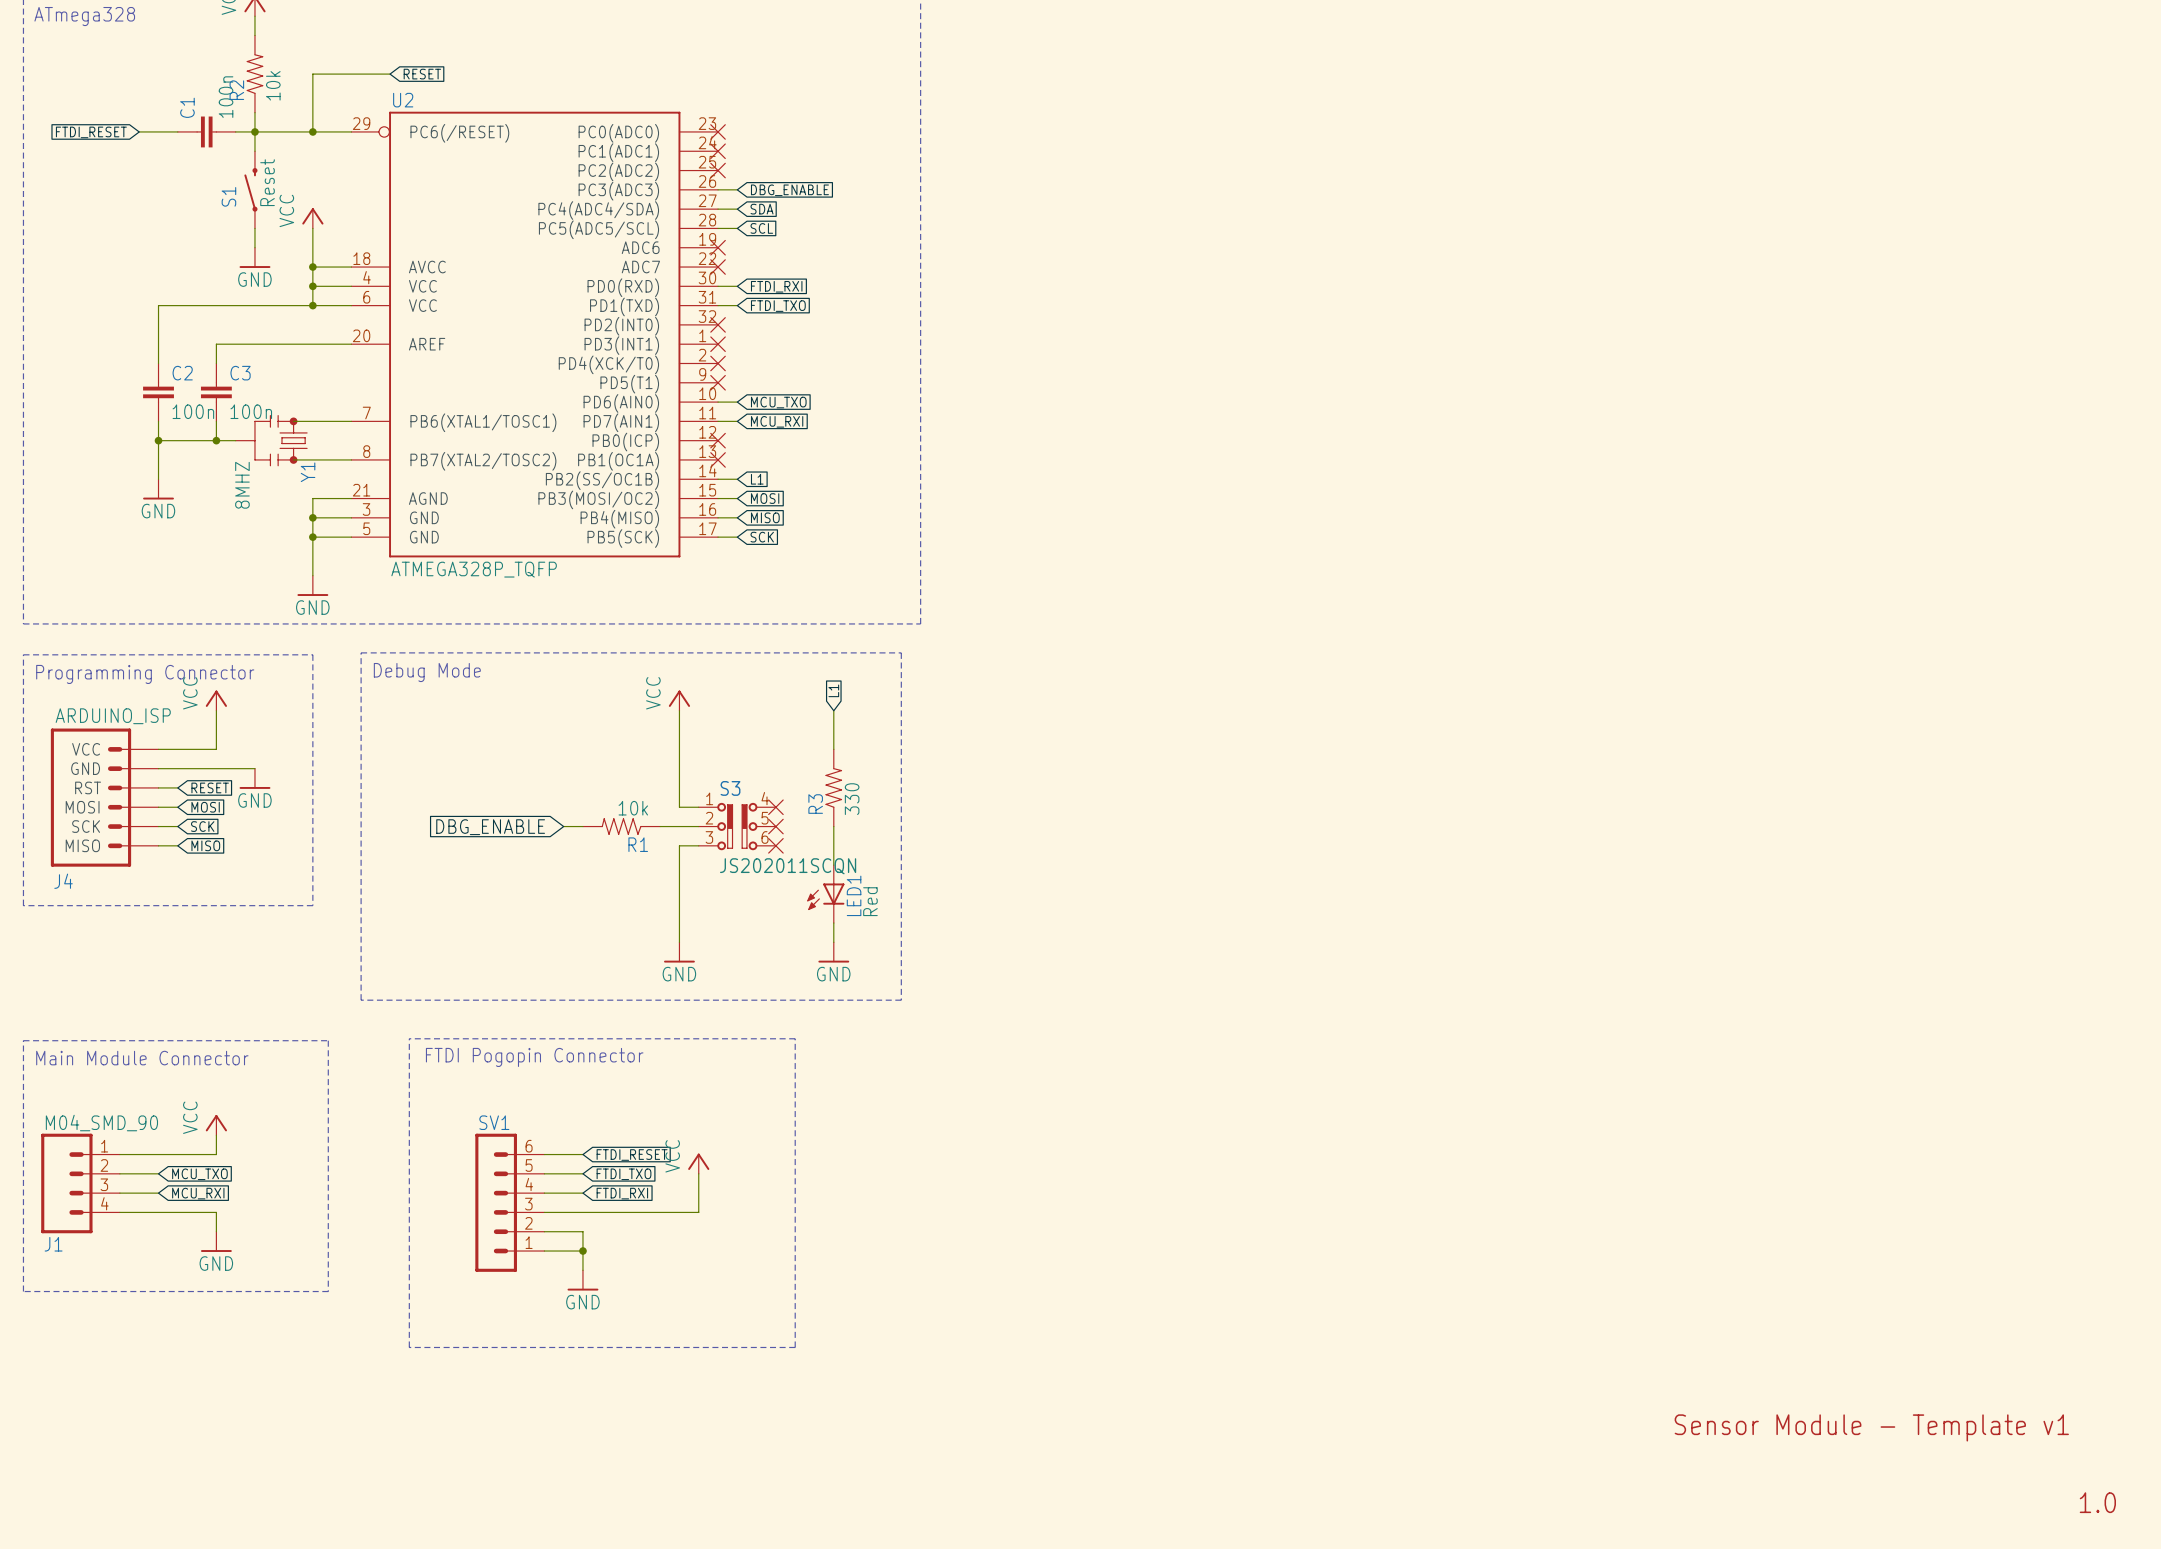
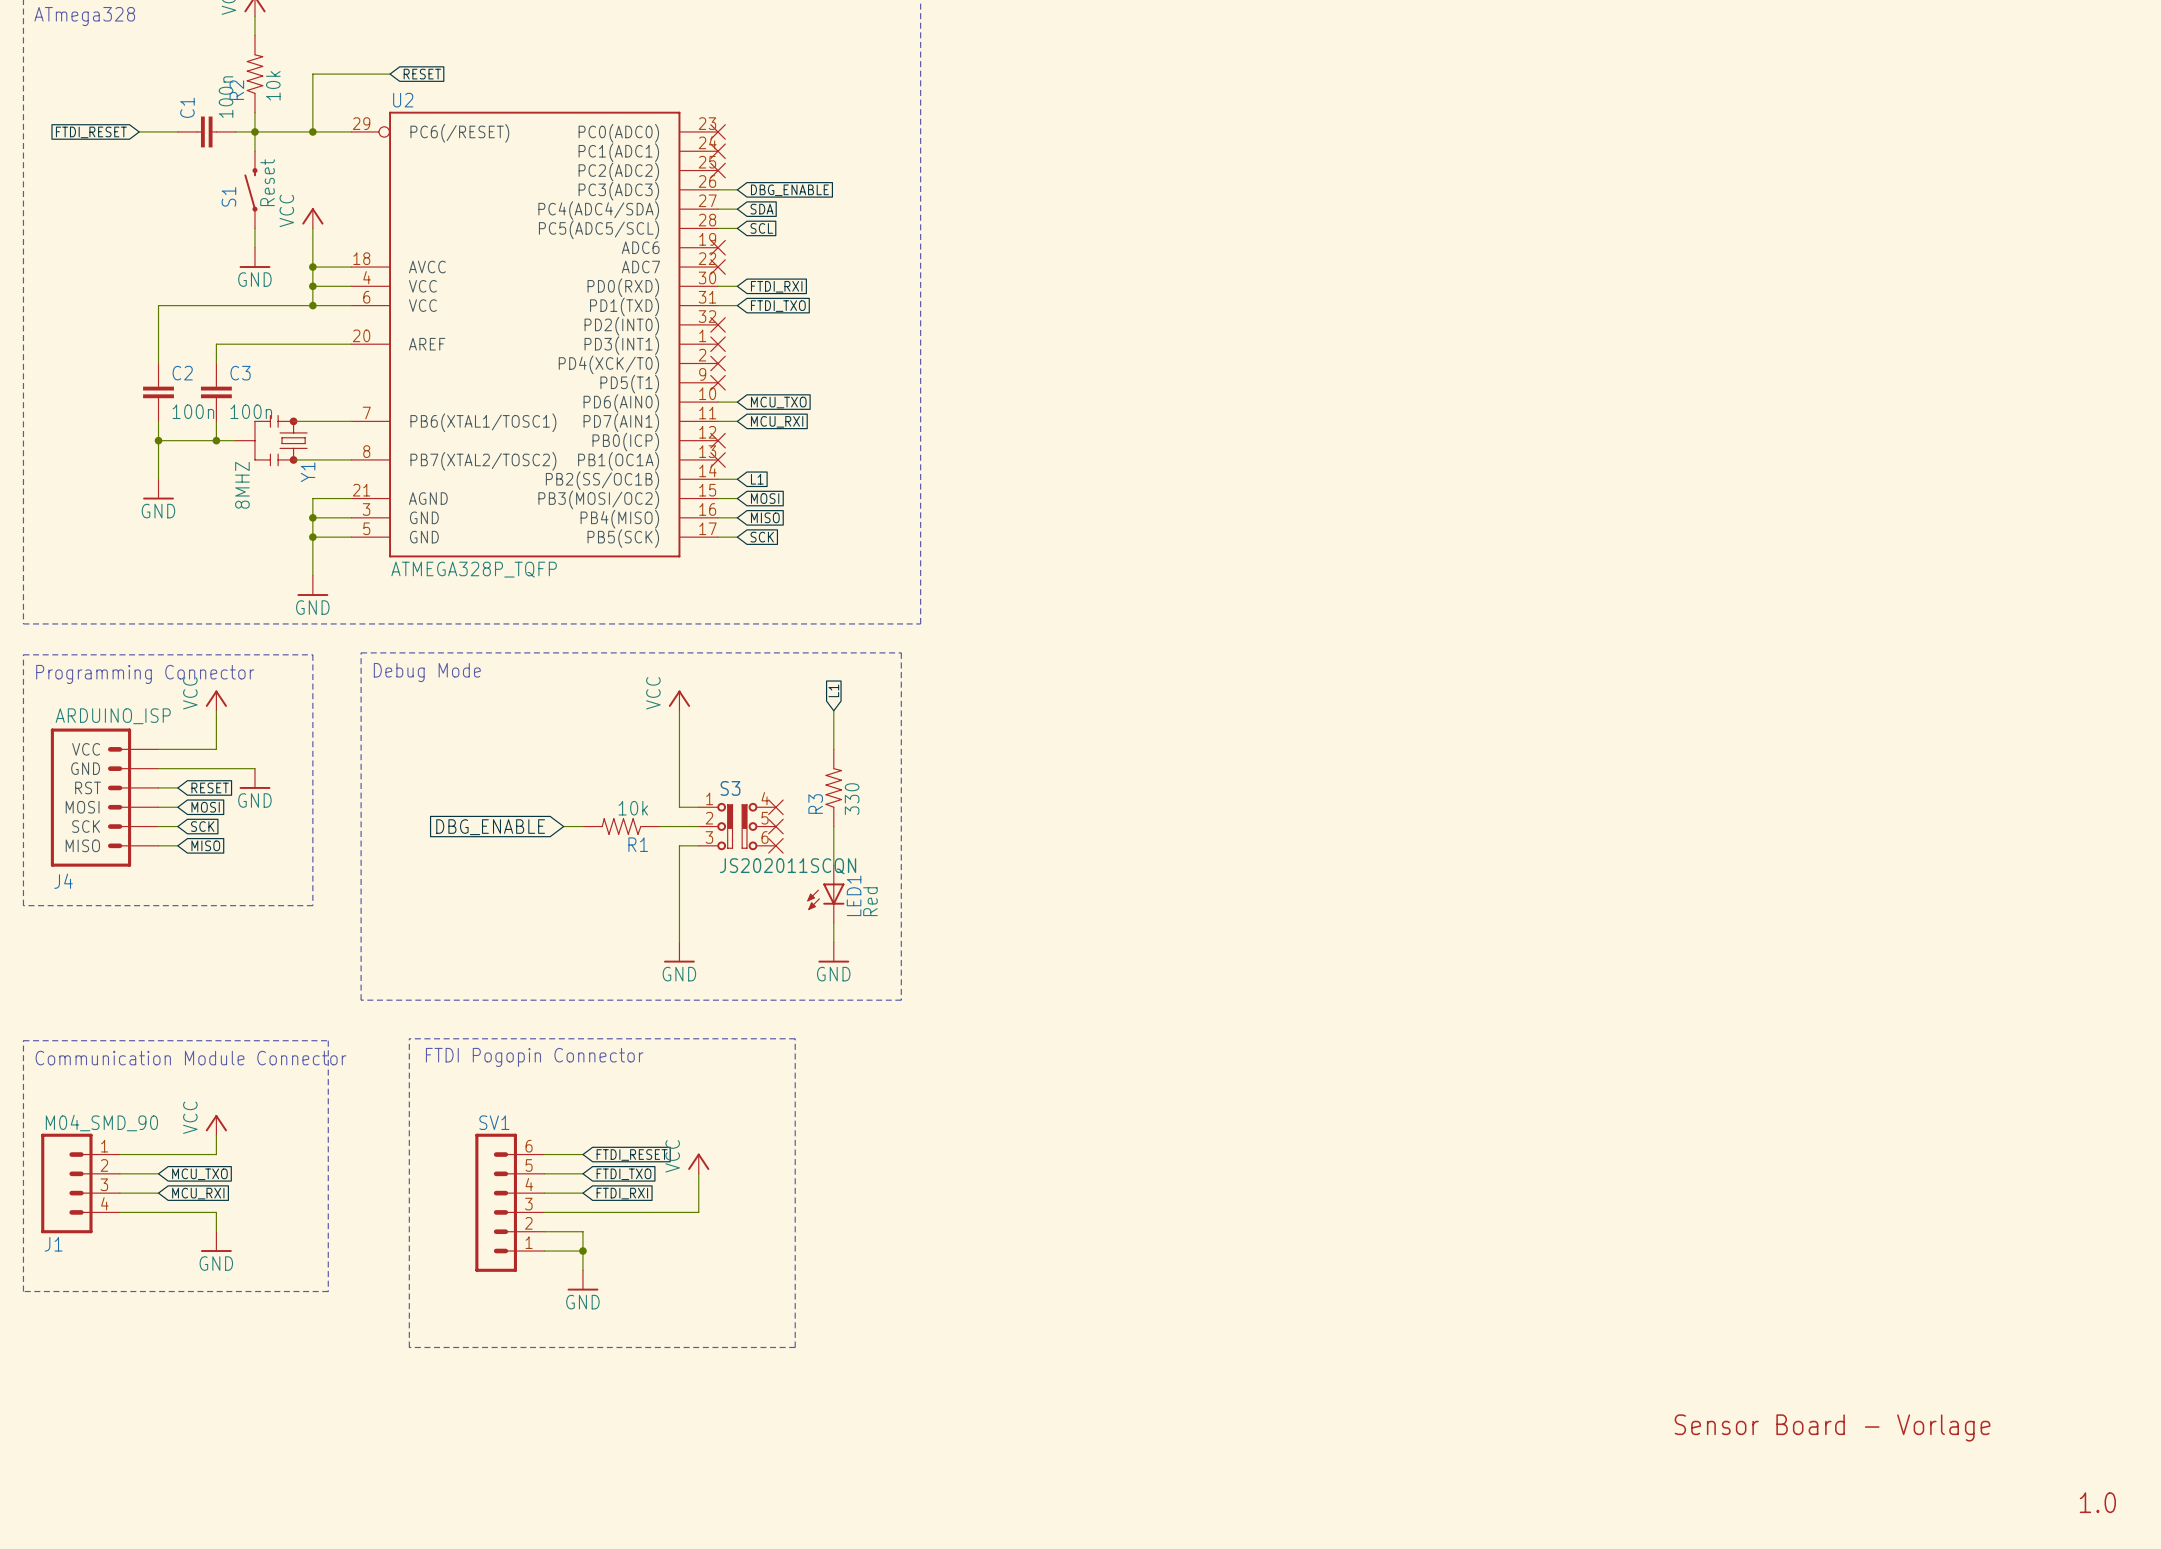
text: Main Module Connector (142, 1058) -> Communication Module Connector (190, 1058)
text: Sensor Module - Template v1 (1871, 1427) -> Sensor Board - Vorlage (1832, 1427)

